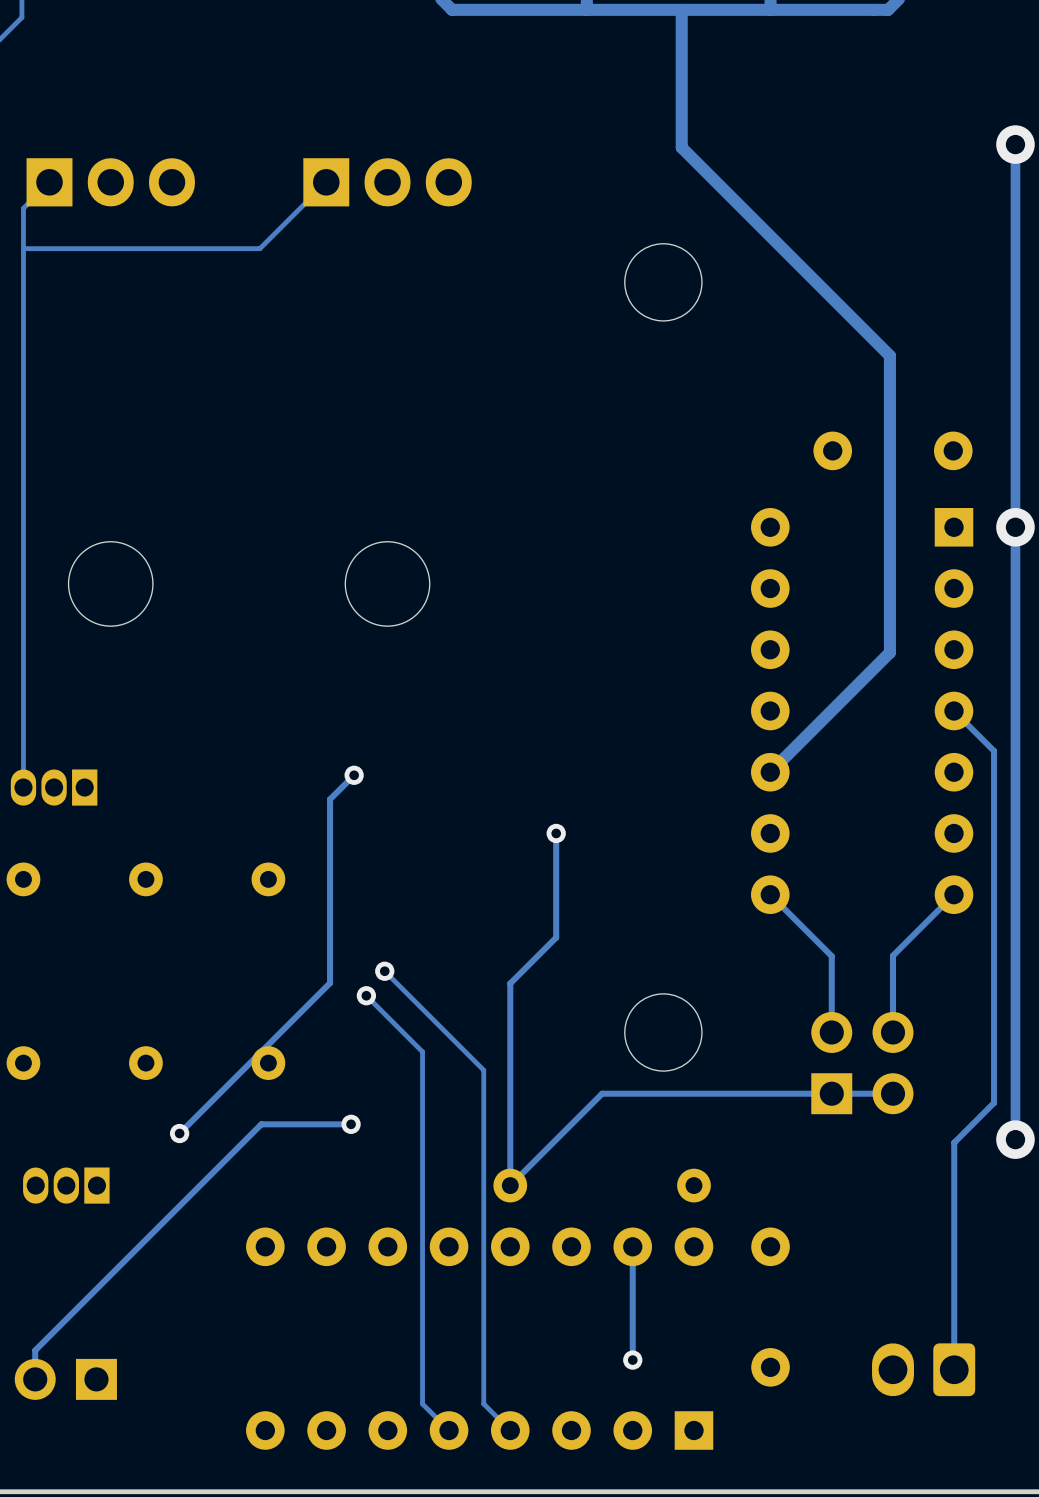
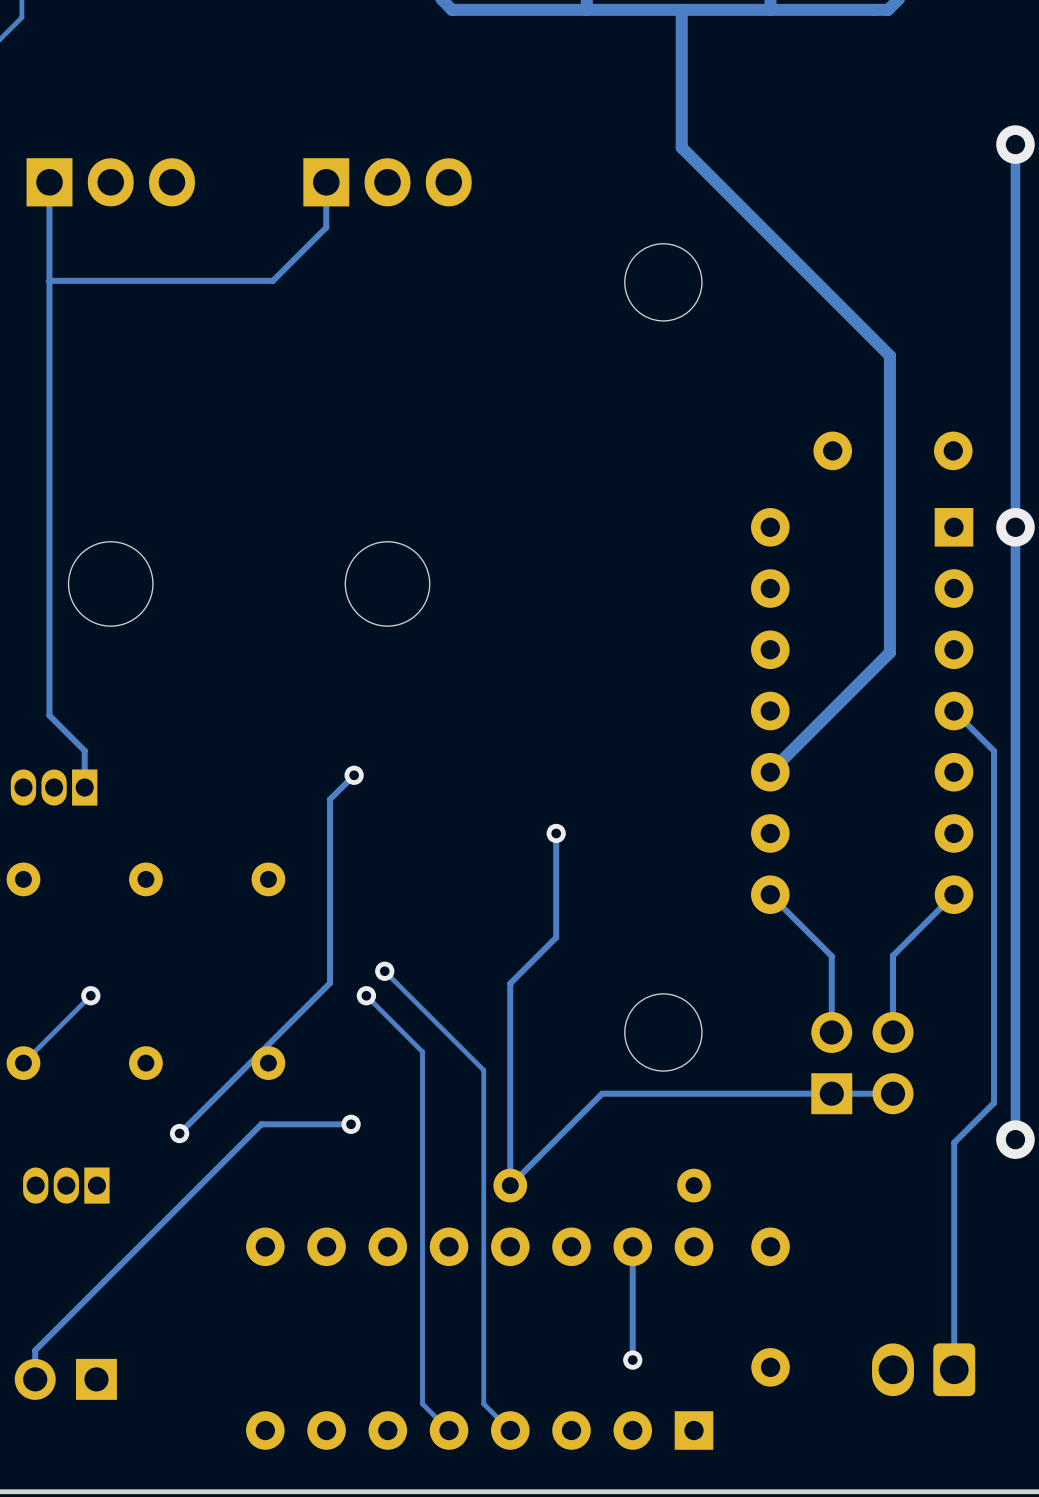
track: (49, 182) (23, 208) (23, 787) -> (49, 182) (49, 715) (84, 750) (84, 787)
track: (326, 182) (259, 248) (23, 248) -> (326, 182) (326, 227) (272, 280) (49, 280)
track: none -> (90, 995) (23, 1063)
via: none -> (90, 995)

